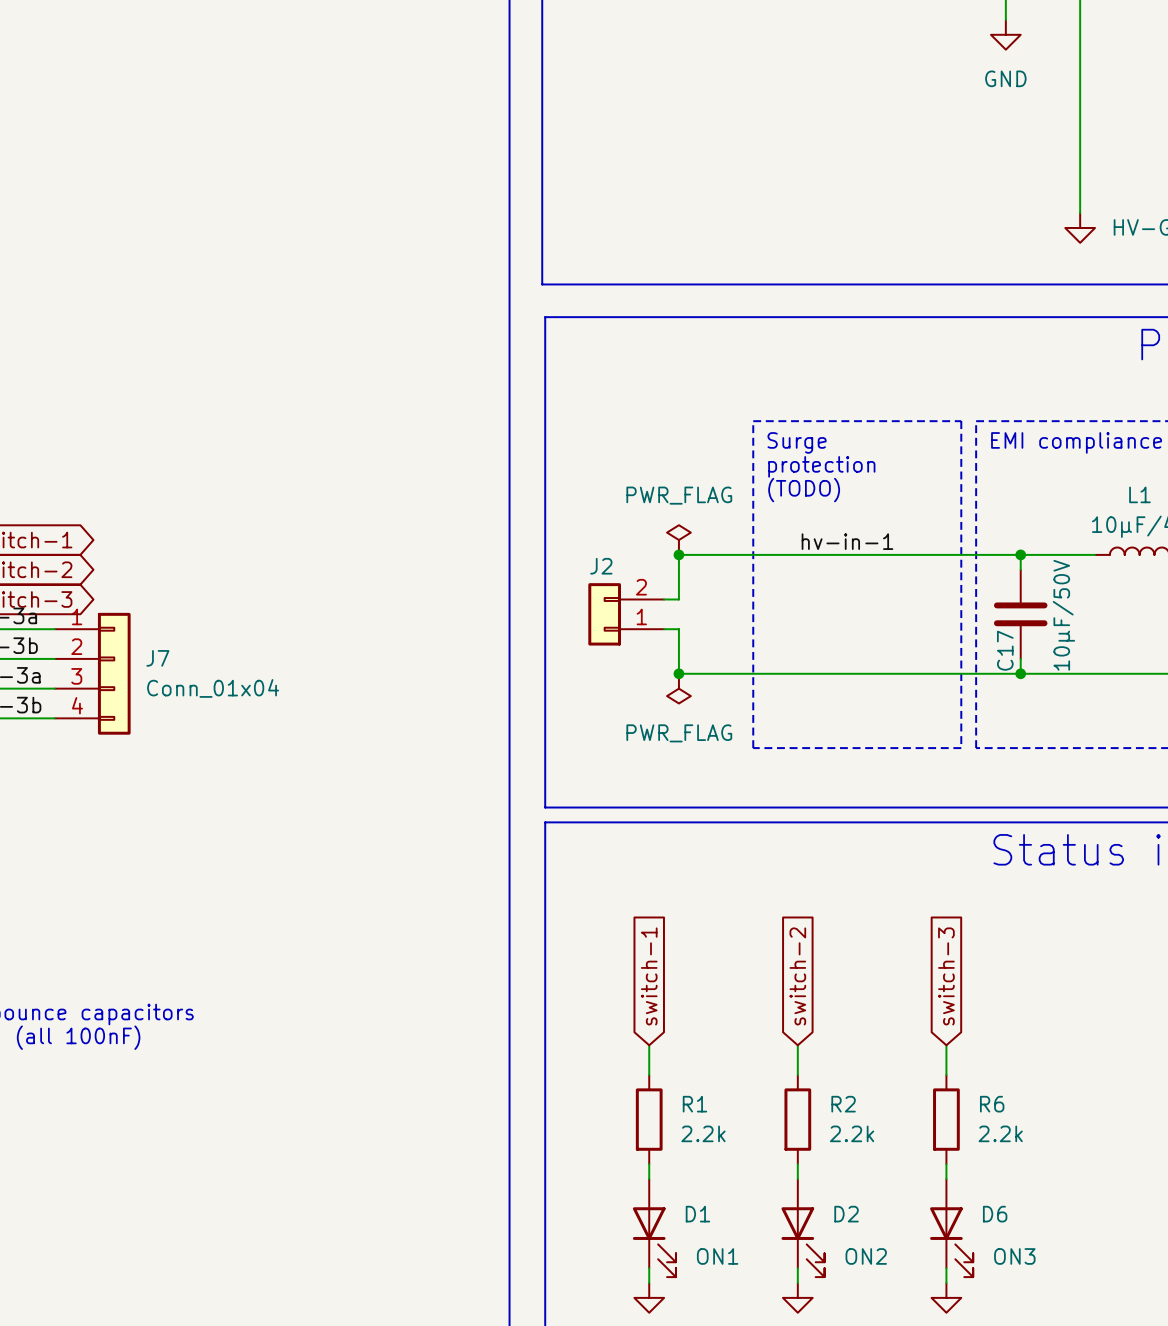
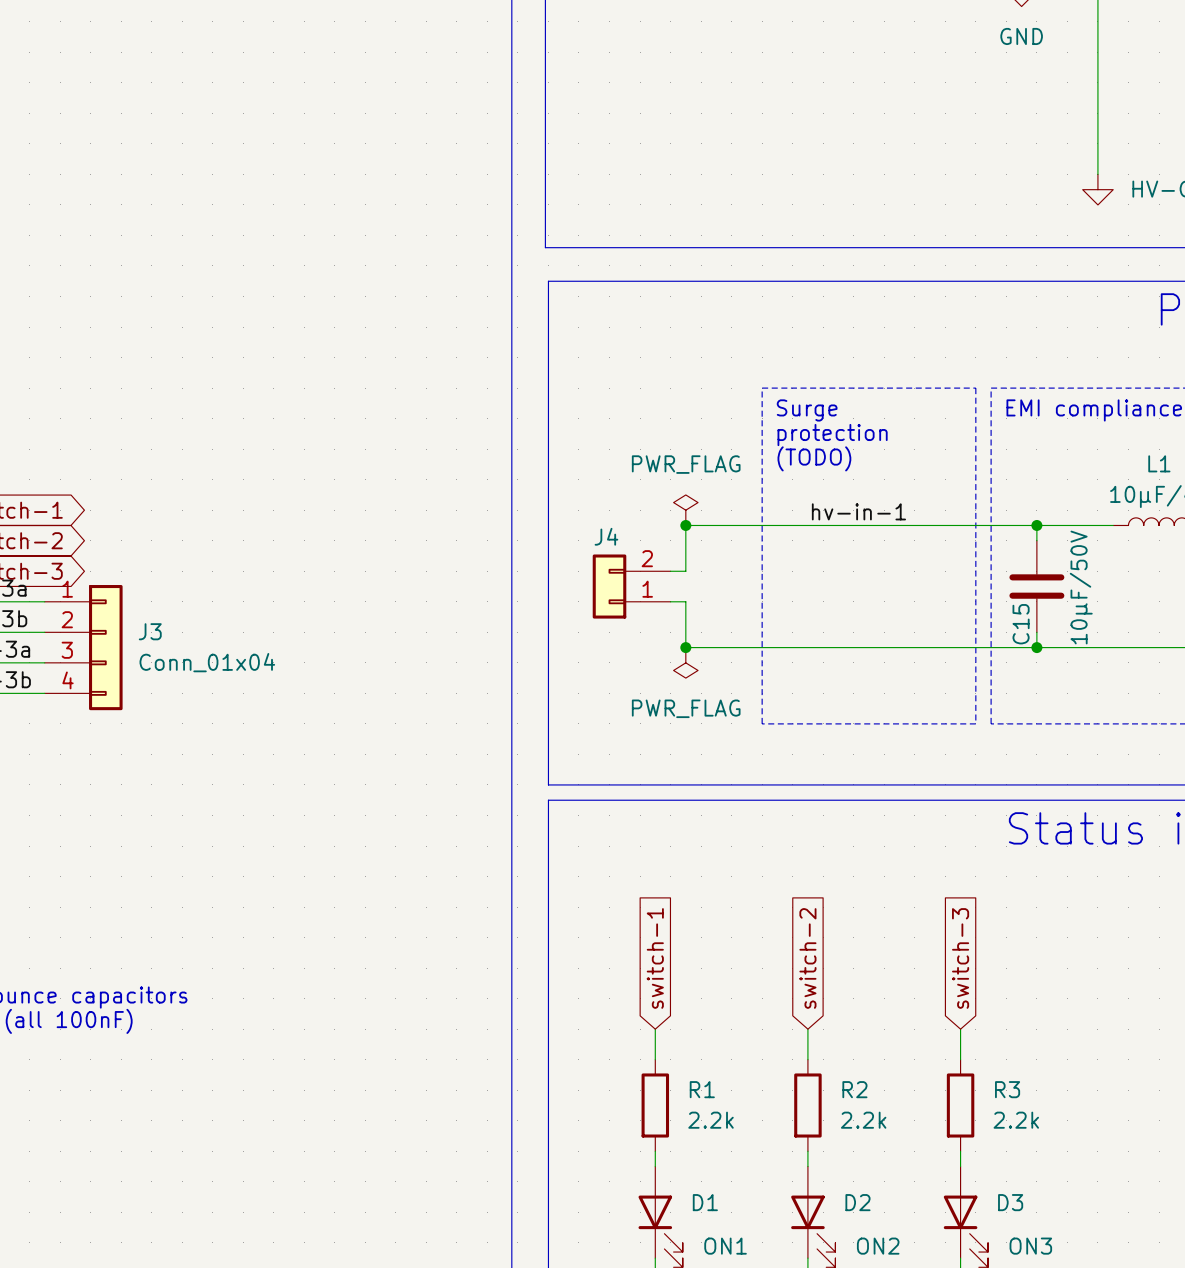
J2 name: J2 (601, 566) -> J4 (606, 536)
C17 name: C17 (1005, 650) -> C15 (1021, 624)
J7 name: J7 (157, 658) -> J3 (150, 631)
R6 name: R6 (992, 1104) -> R3 (1007, 1089)
D6 name: D6 (995, 1214) -> D3 (1010, 1202)

